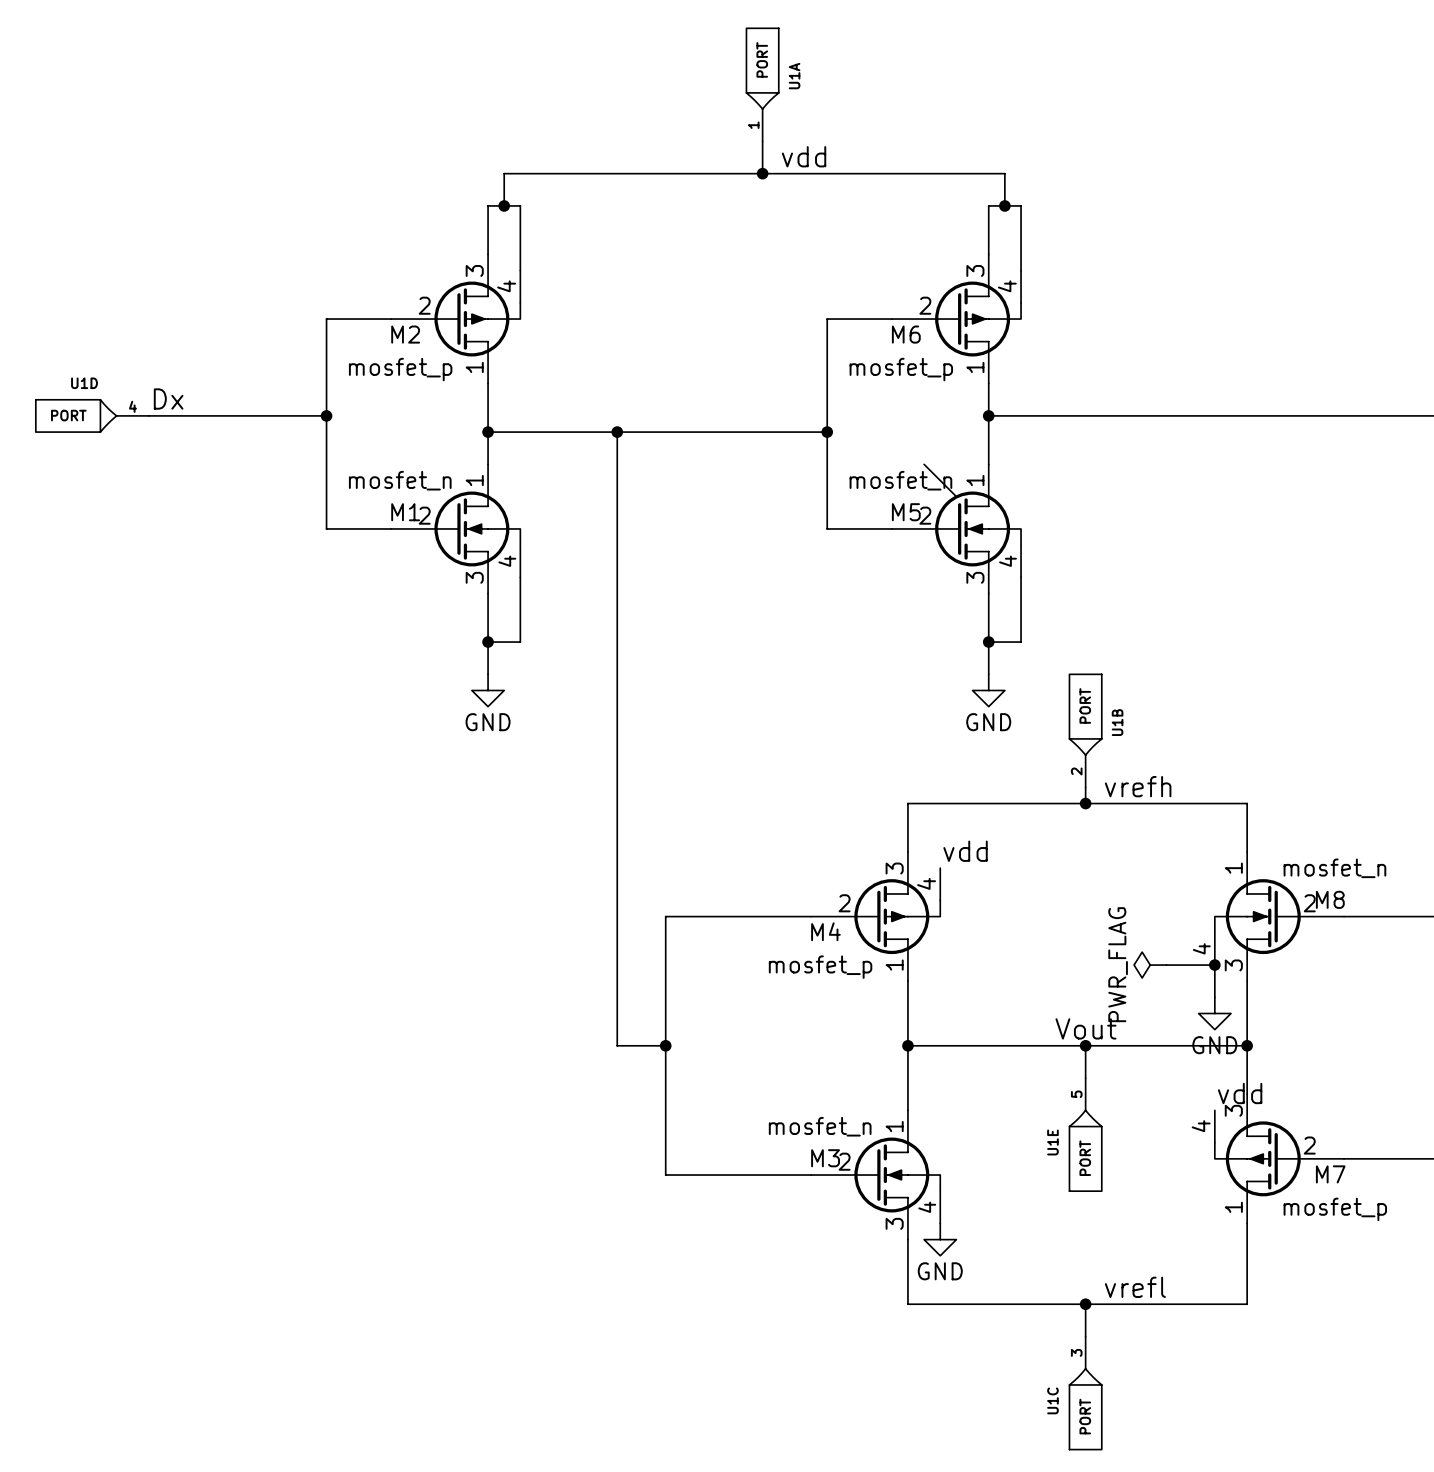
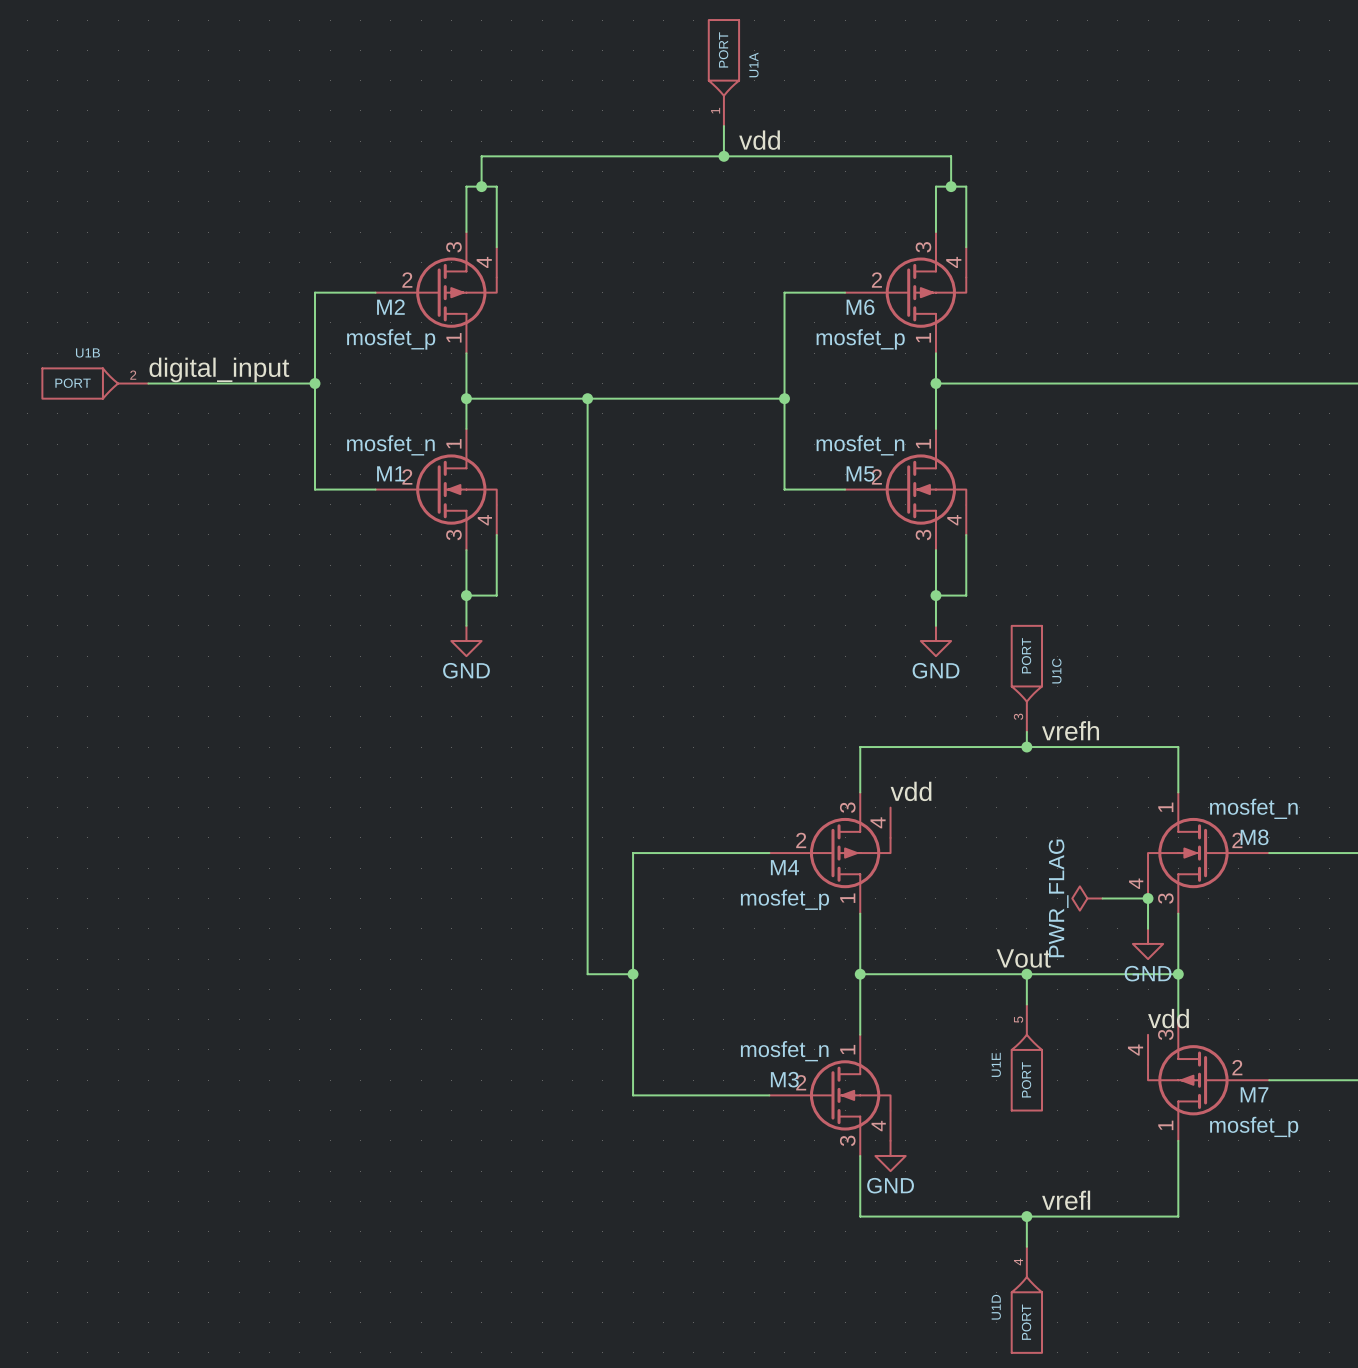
label: Dx (168, 399) -> digital_input (219, 369)
U1D rotation: 0° (76, 415) -> 90° counterclockwise (1026, 1314)
U1D position: (92, 415) -> (1026, 1299)
wire: (924, 464) (956, 496) -> none
U1B rotation: 0° (1085, 714) -> 90° counterclockwise (80, 383)
U1B position: (1085, 730) -> (95, 383)
U1C position: (1085, 1393) -> (1026, 678)
U1C rotation: 0° (1085, 1409) -> 180° (1026, 663)

